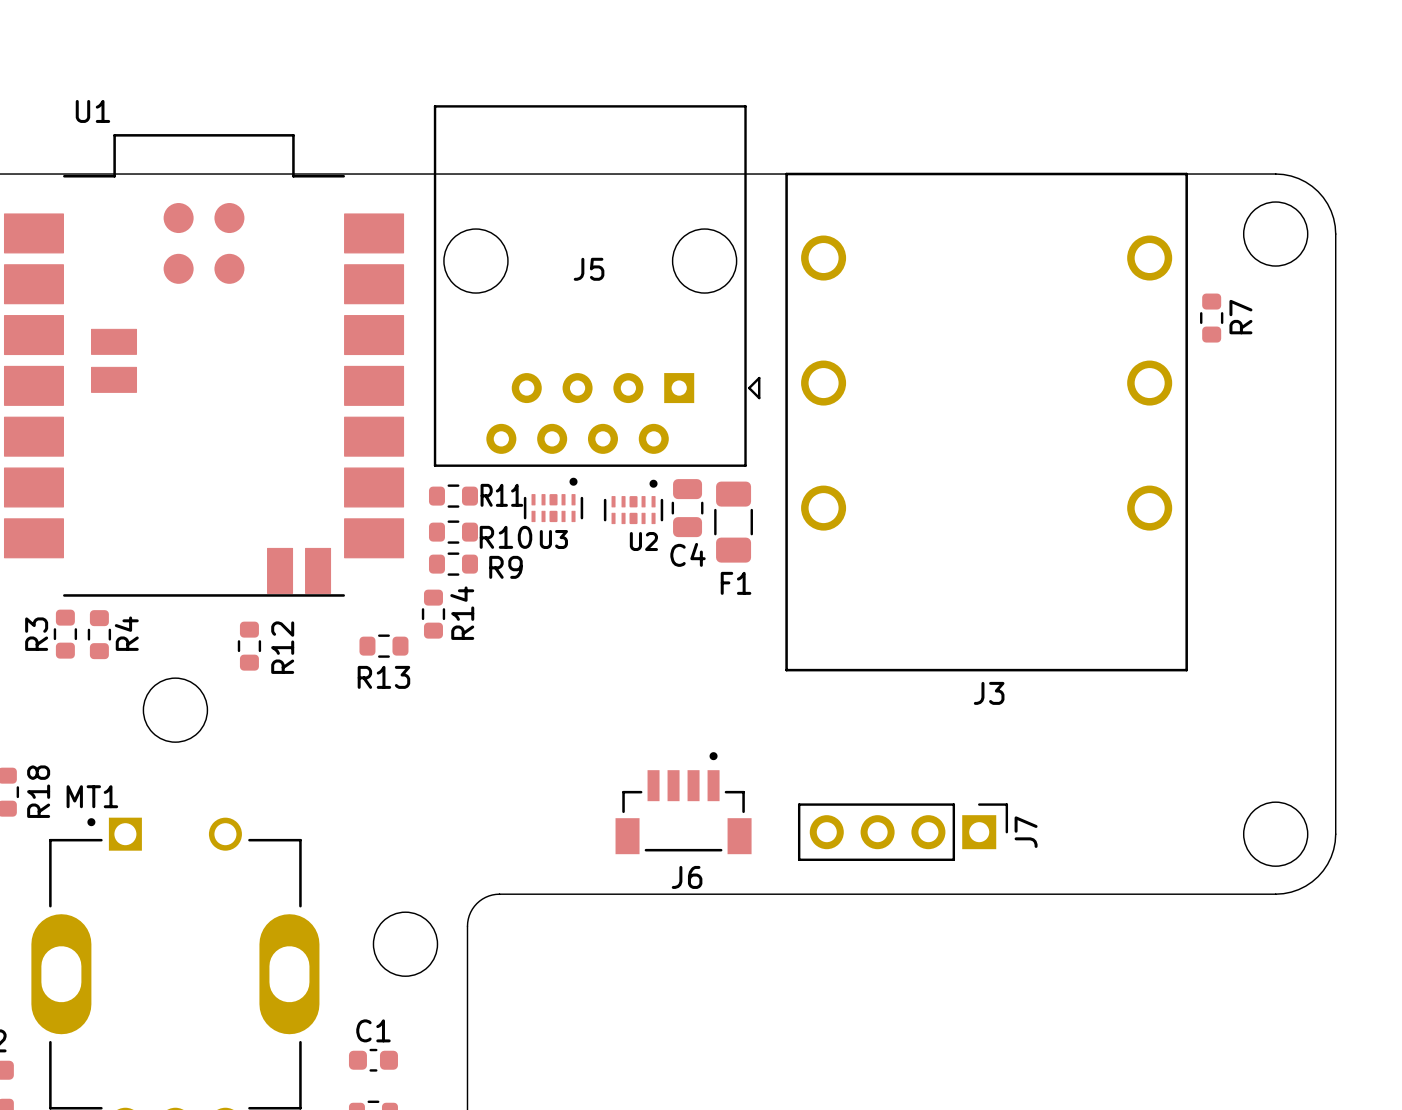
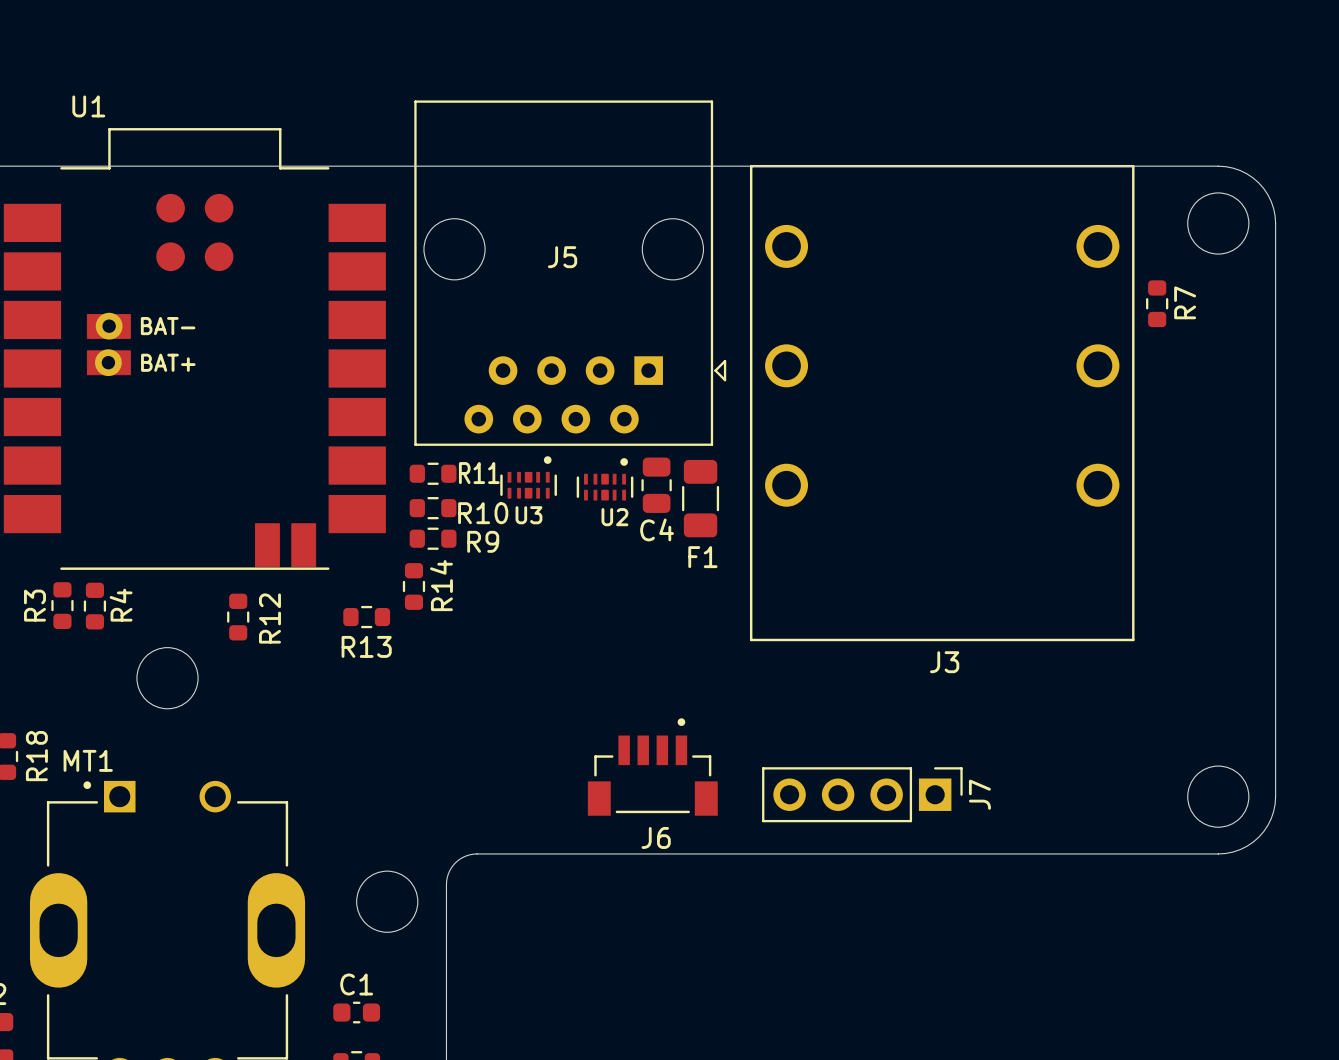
part: none -> (109, 326)
text: none -> BAT- (168, 326)
part: none -> (108, 362)
text: none -> BAT+ (168, 362)

